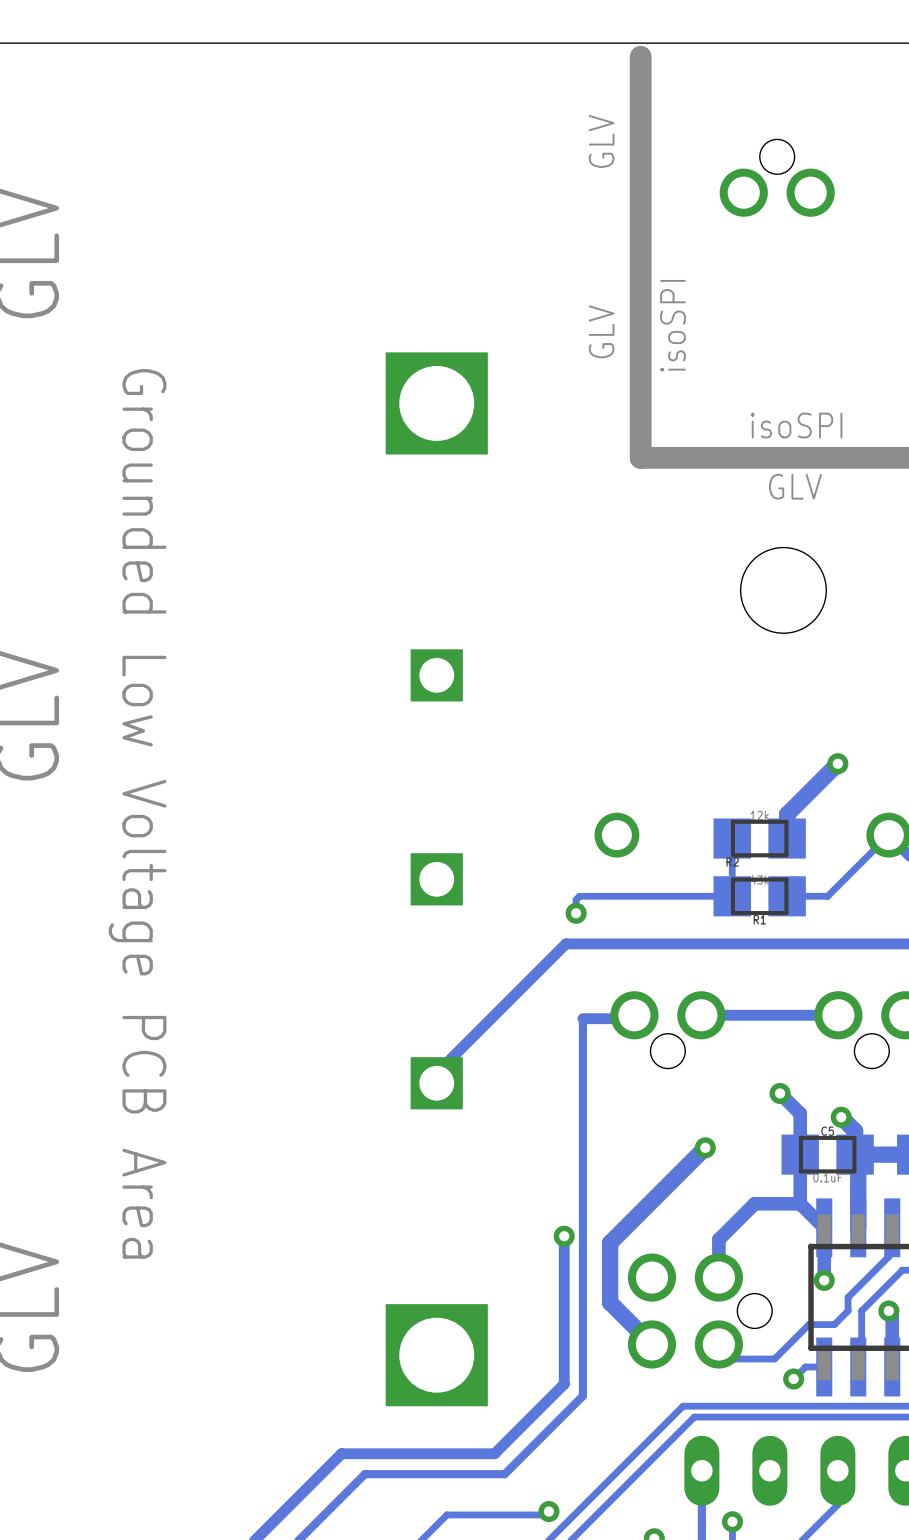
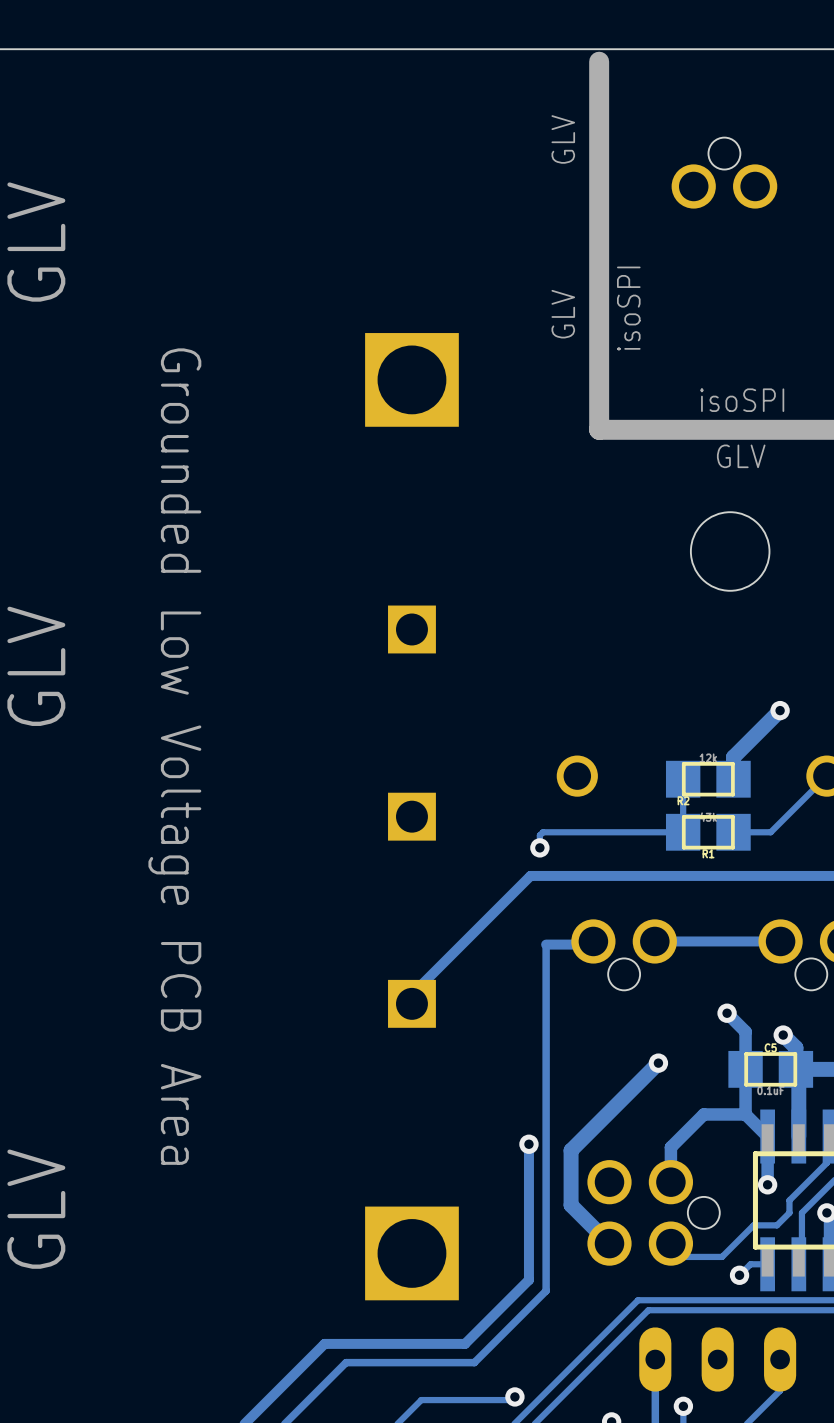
text position: Grounded Low Voltage PCB Area (137, 813) -> Grounded Low Voltage PCB Area (174, 756)

